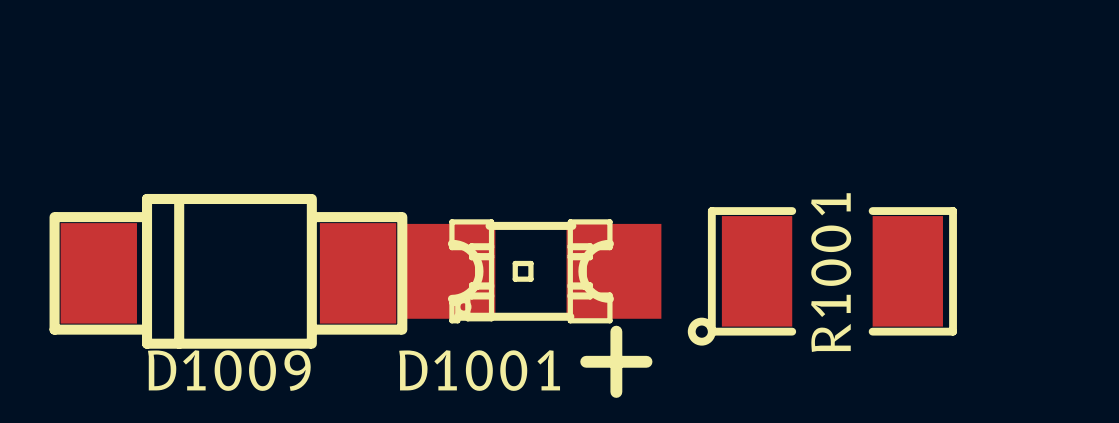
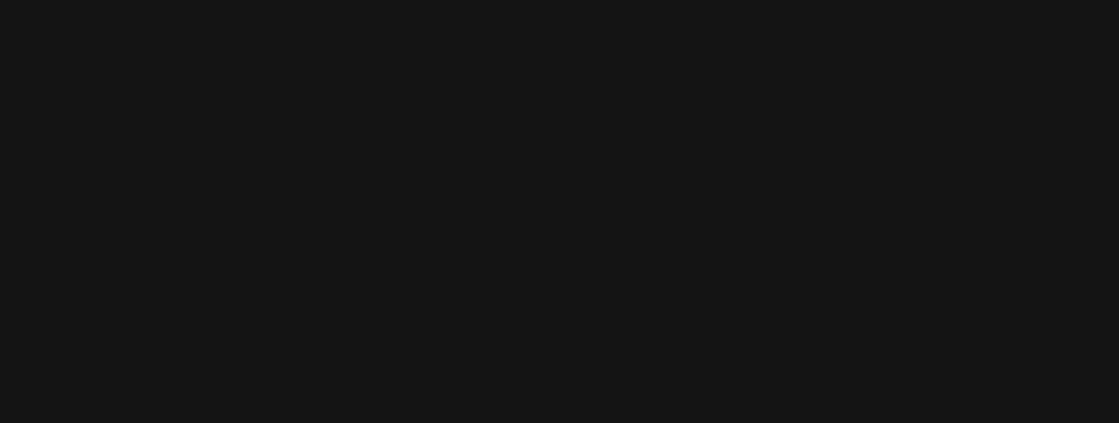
D1009: (228, 271) -> none
R1001: (822, 276) -> none
D1001: (530, 308) -> none

